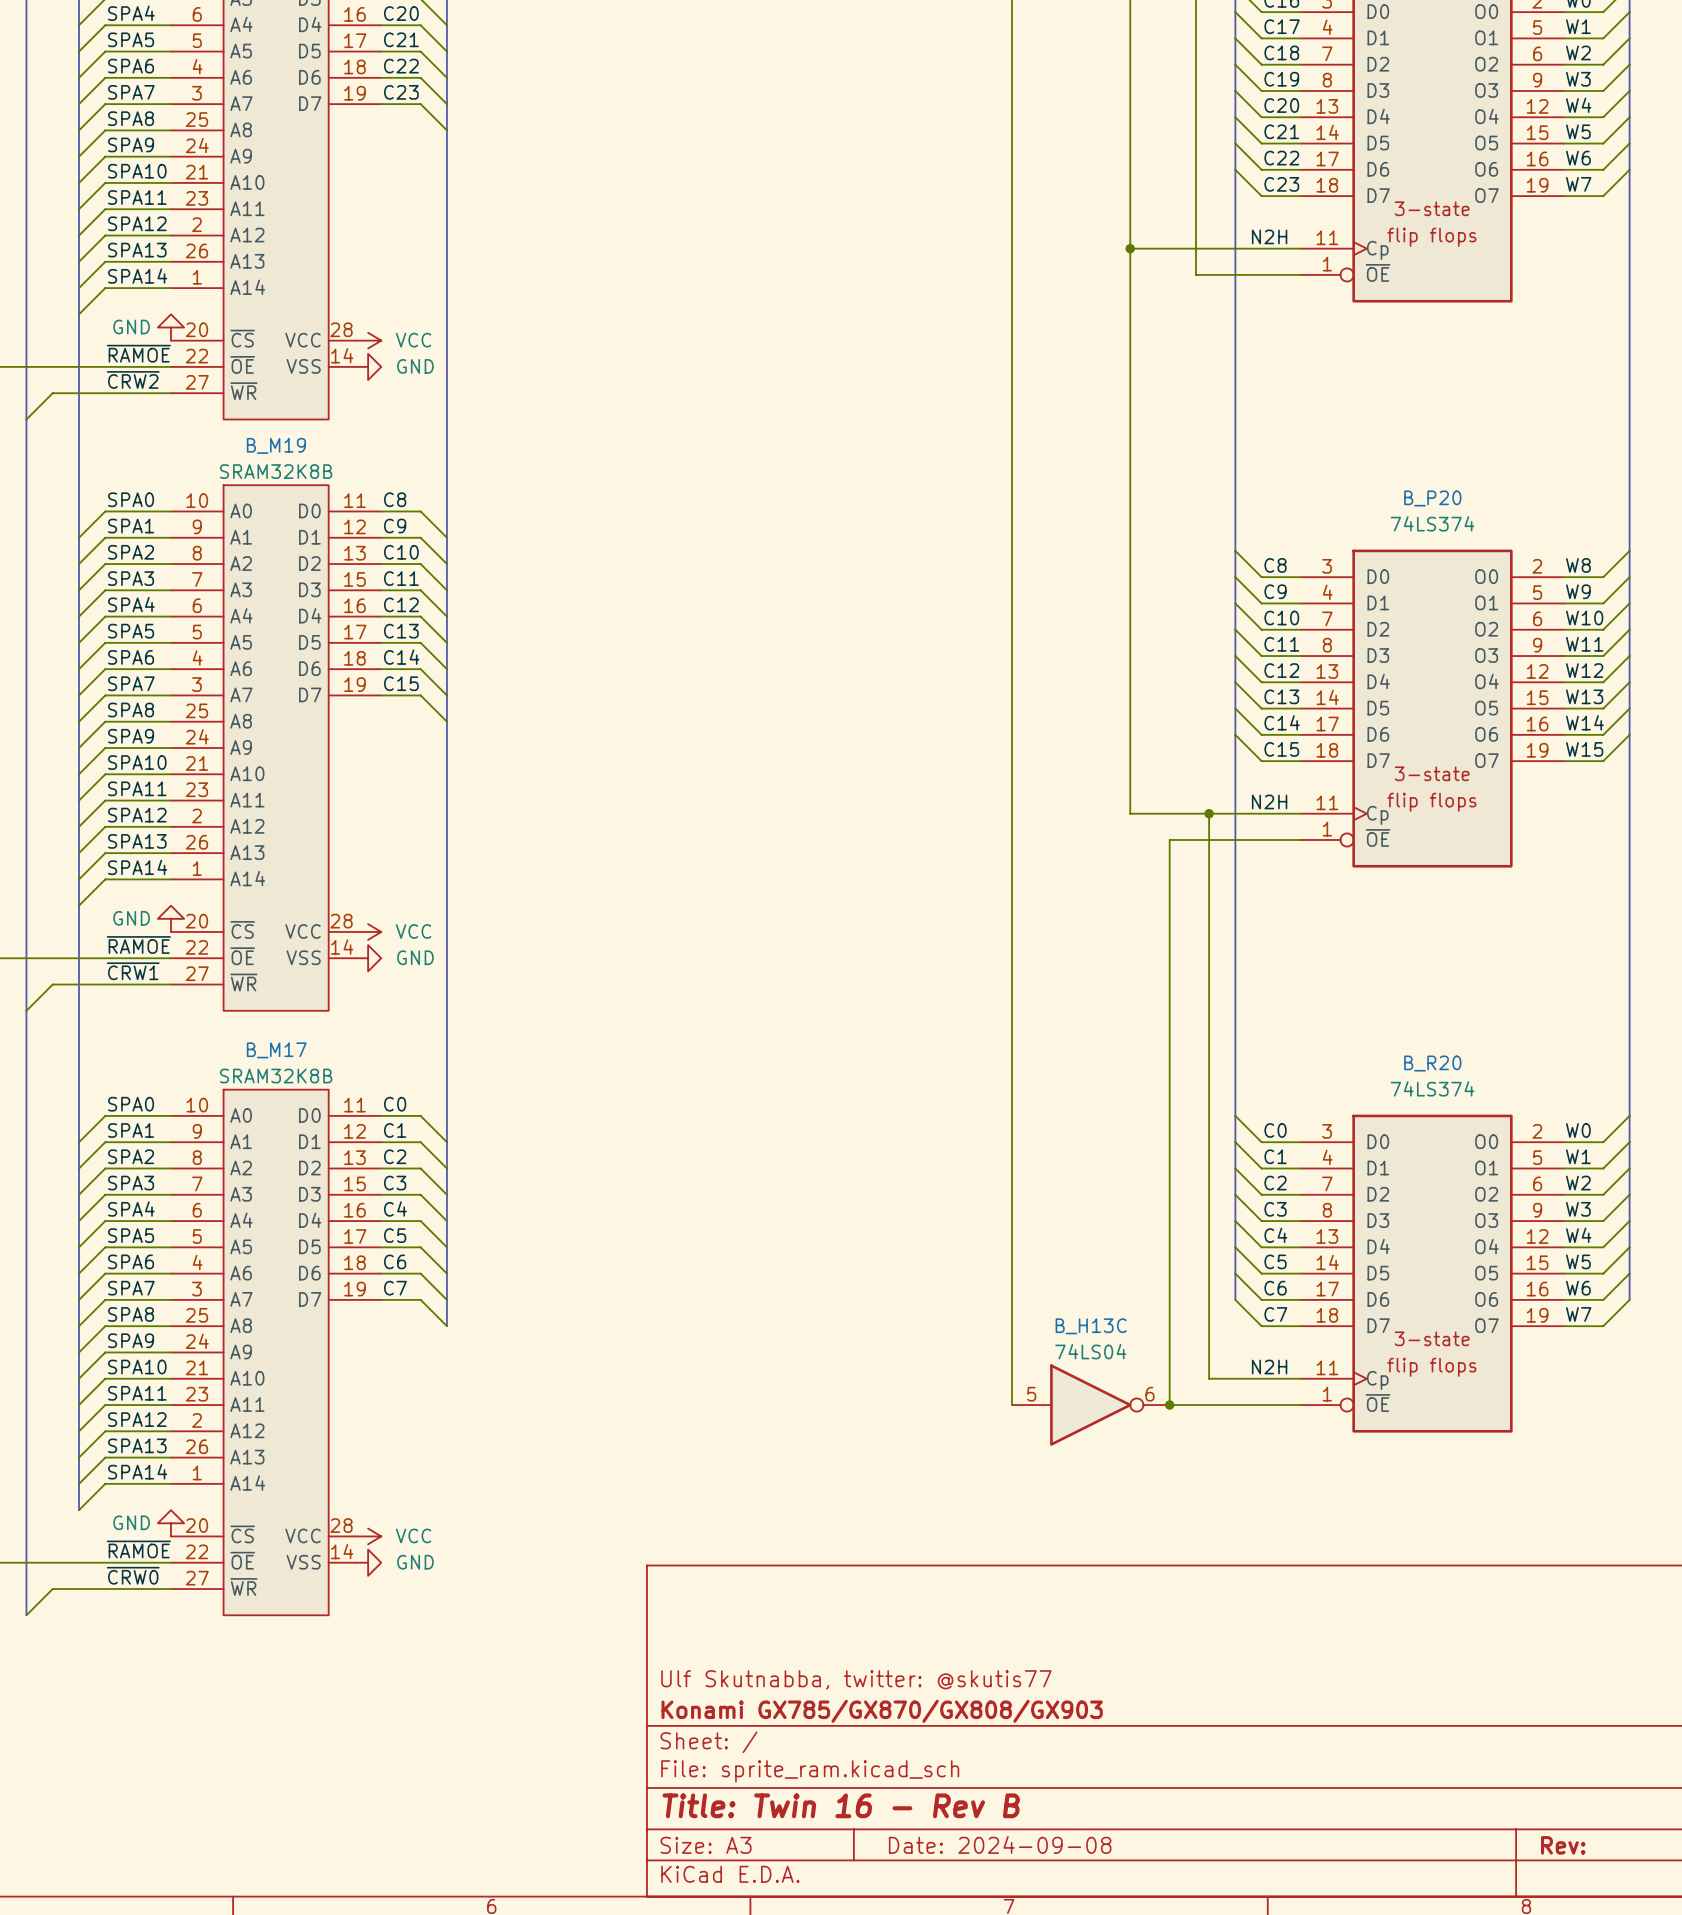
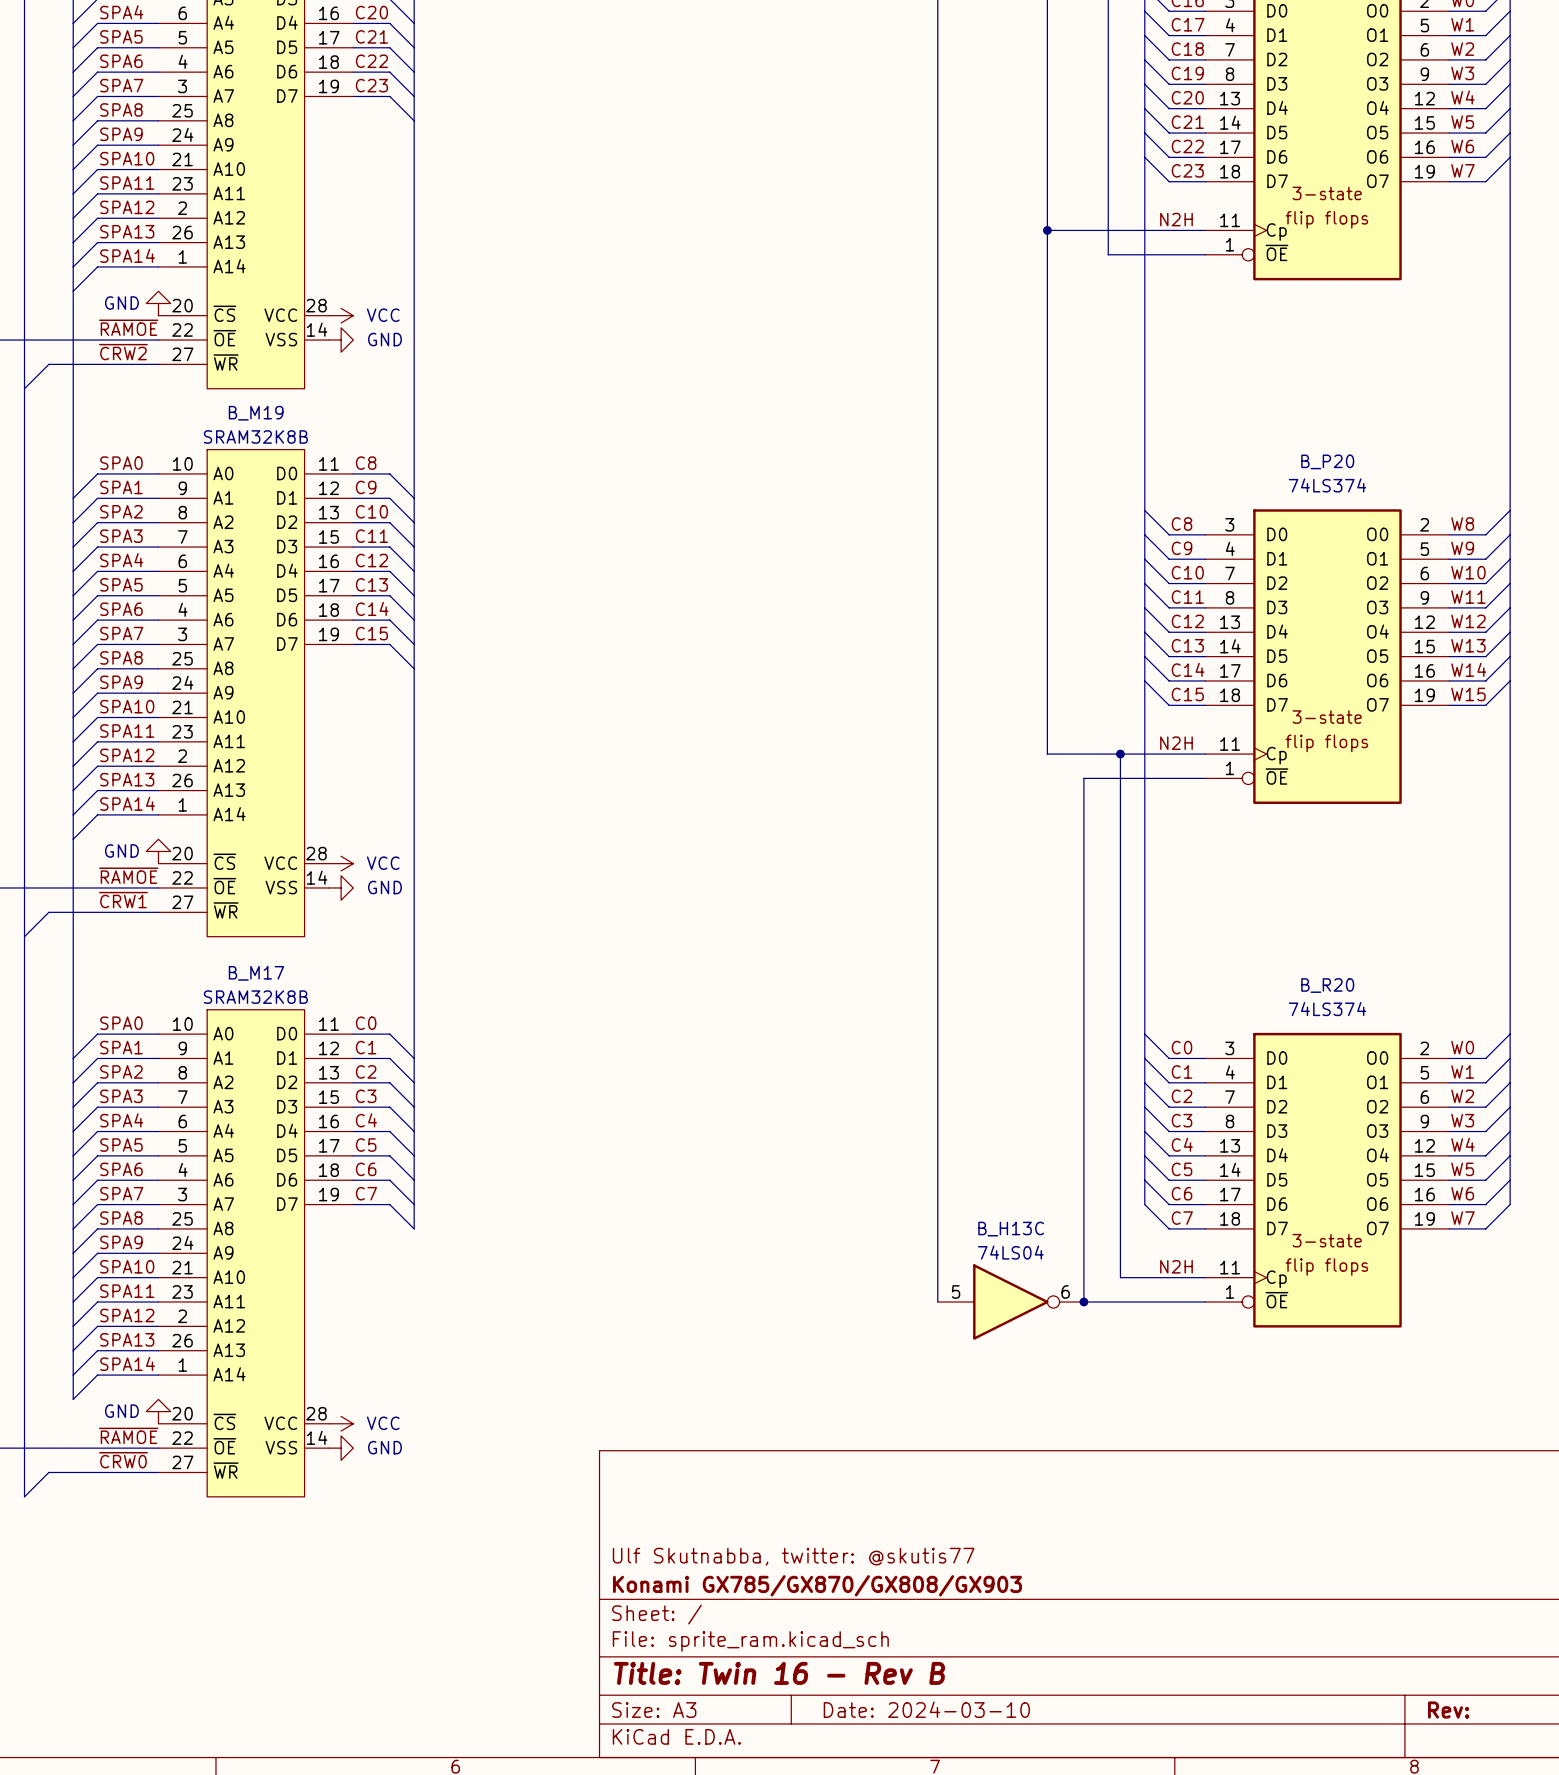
title block: Date: 2024-09-08 (1000, 1844) -> Date: 2024-03-10 (926, 1709)

